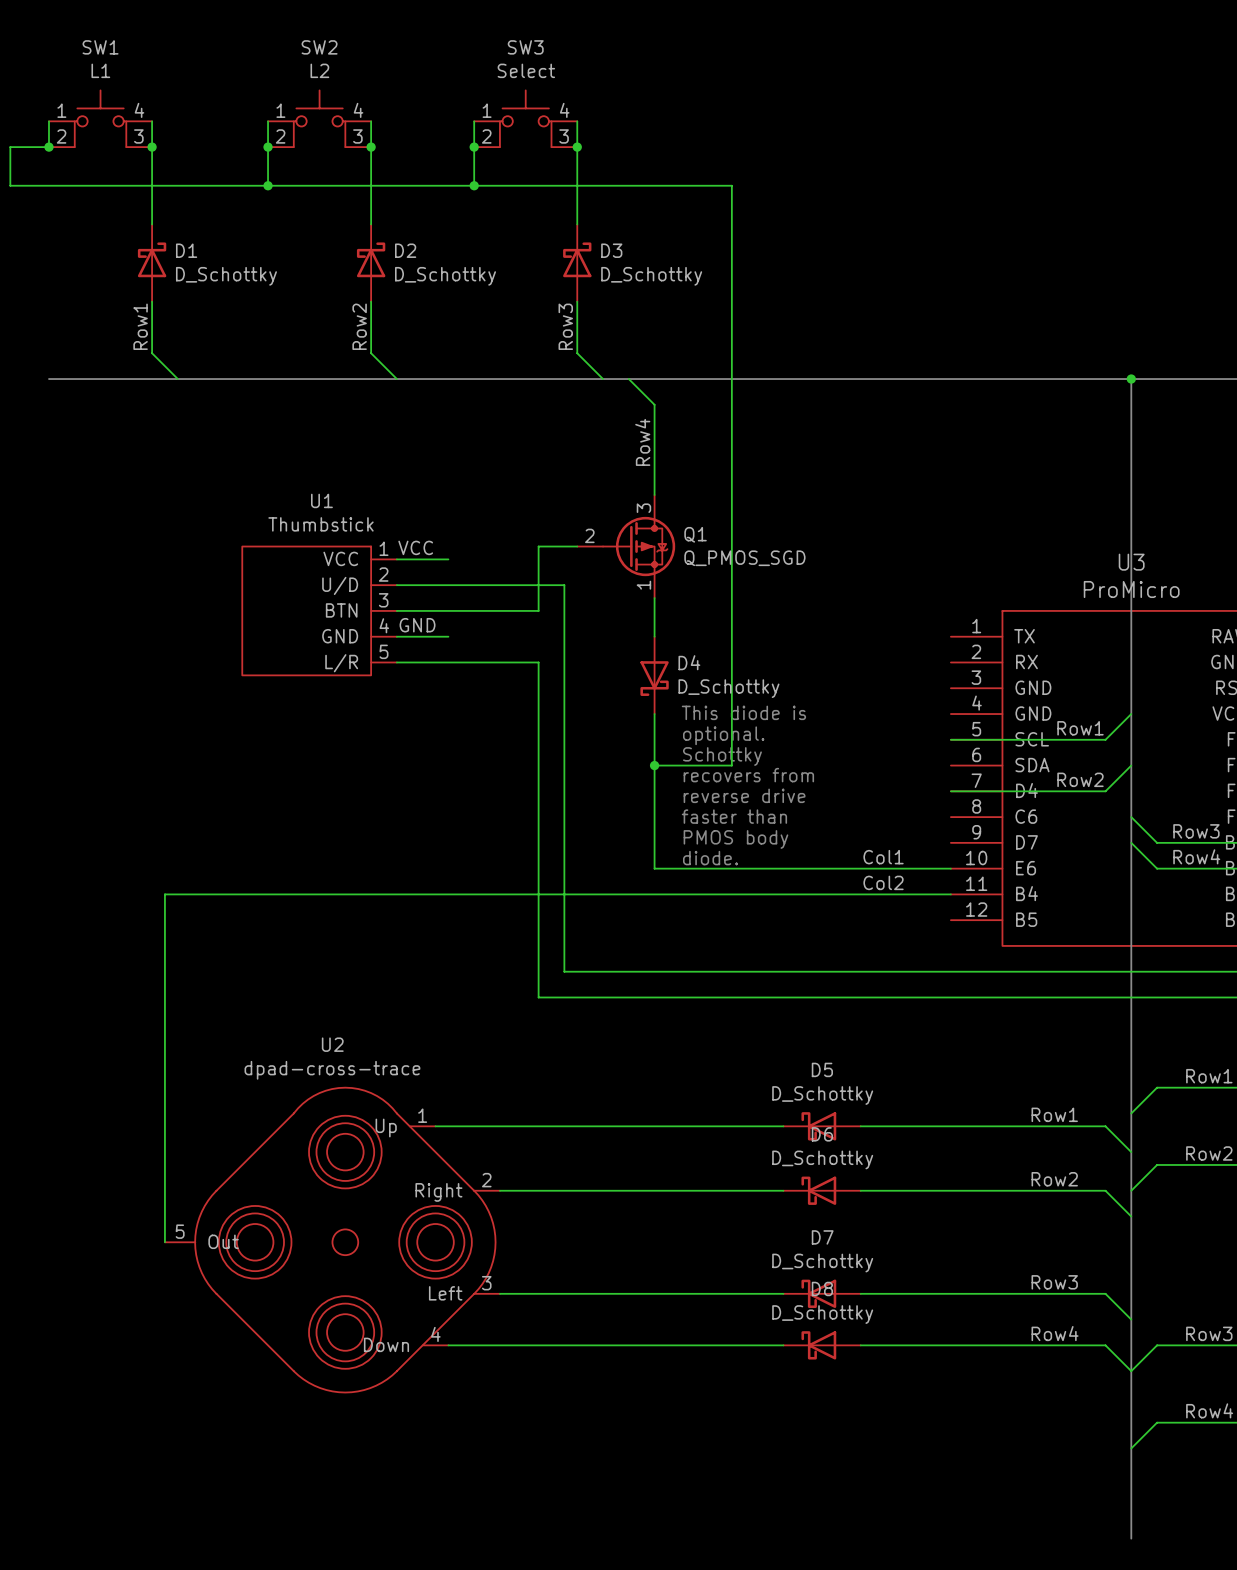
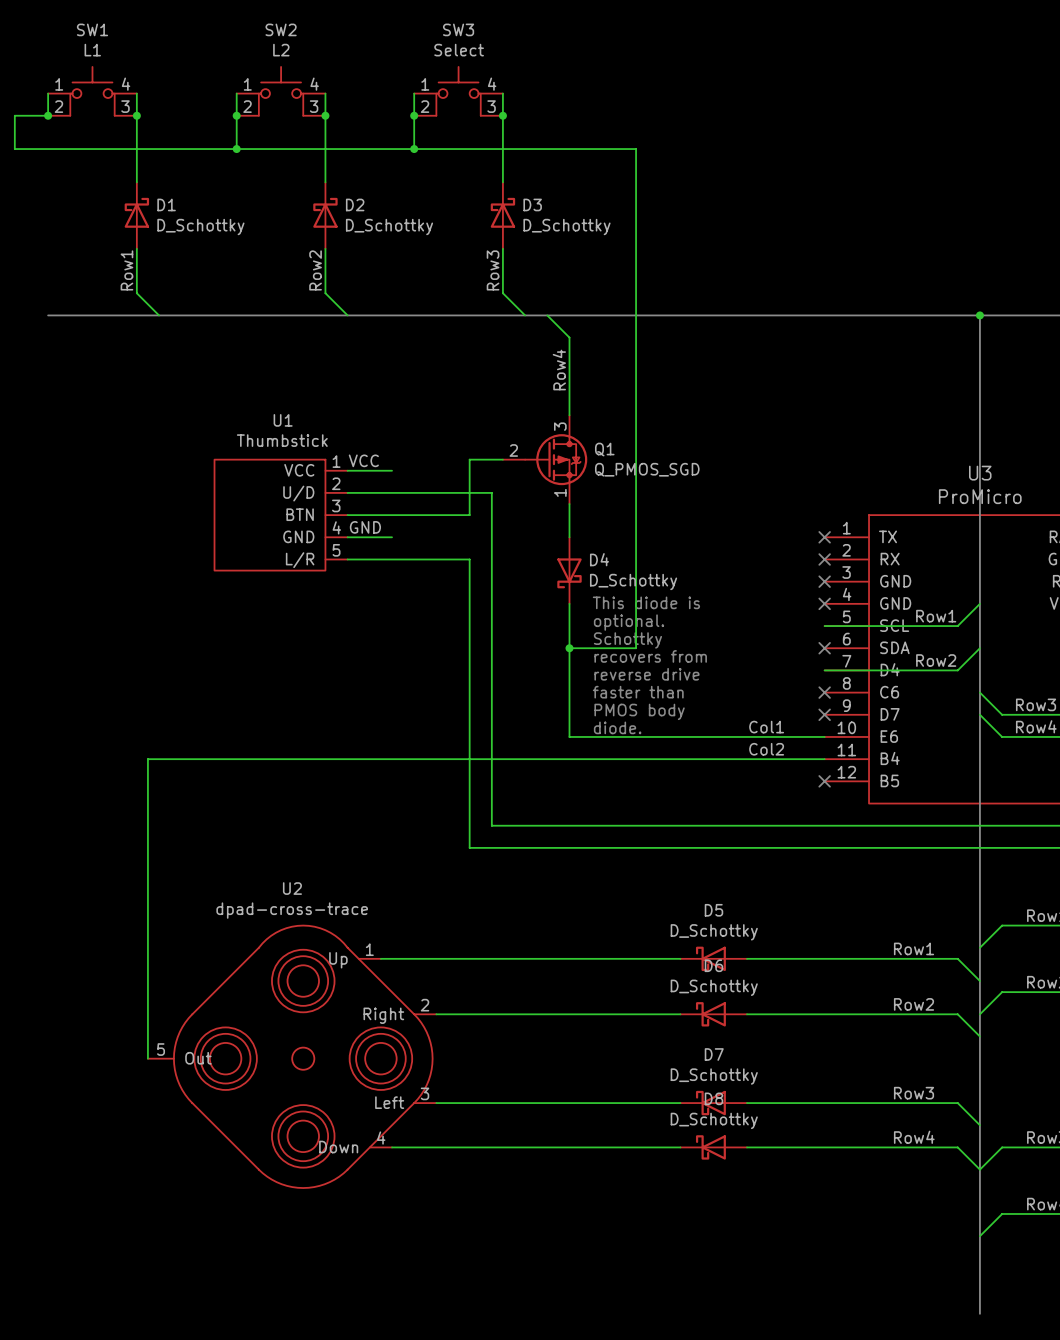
no-connect mark: none -> (824, 537)
no-connect mark: none -> (824, 559)
no-connect mark: none -> (824, 581)
no-connect mark: none -> (824, 603)
no-connect mark: none -> (824, 648)
no-connect mark: none -> (824, 692)
no-connect mark: none -> (824, 714)
no-connect mark: none -> (824, 781)

